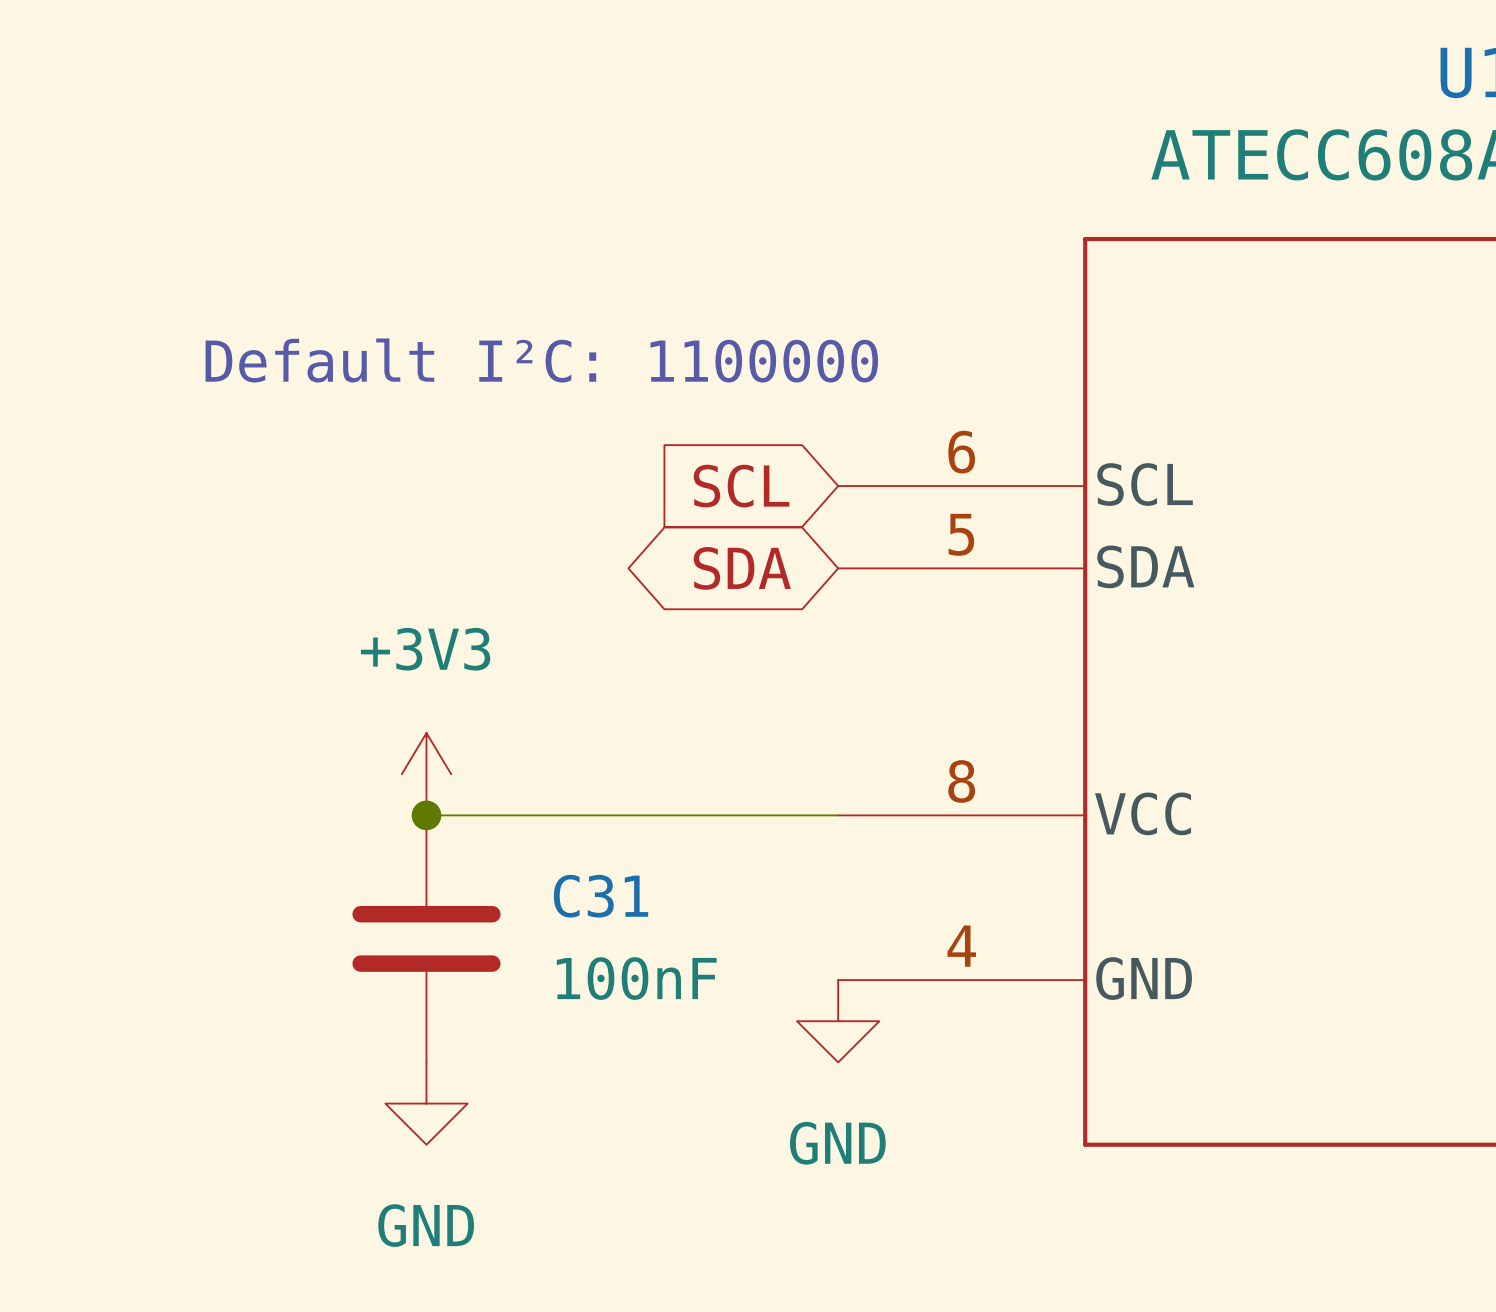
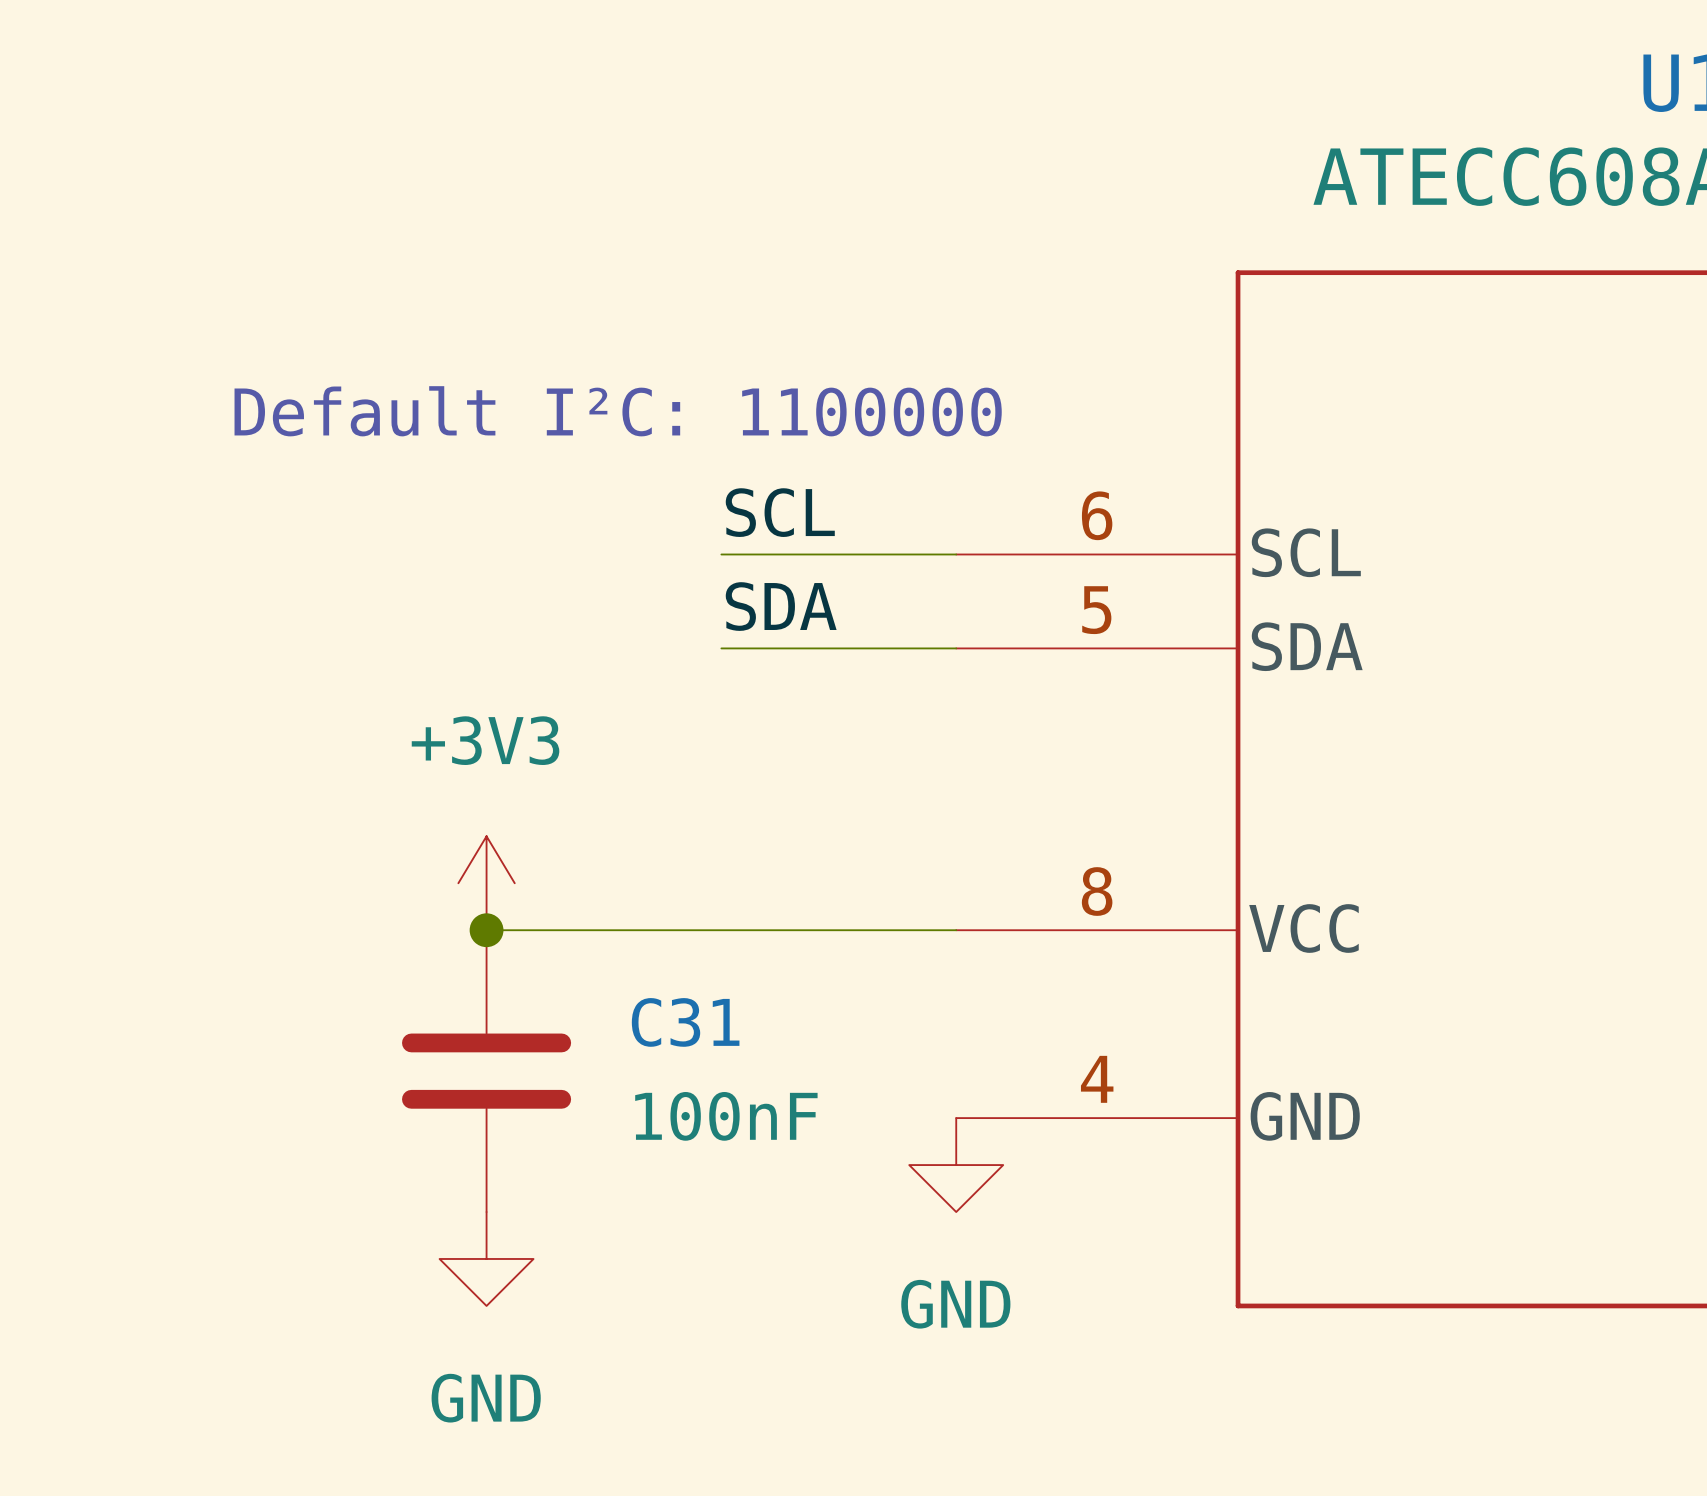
label: none -> SCL (780, 512)
wire: none -> (721, 554) (956, 554)
global label: SCL (741, 486) -> none
label: none -> SDA (781, 606)
wire: none -> (721, 648) (956, 648)
global label: SDA (742, 568) -> none

